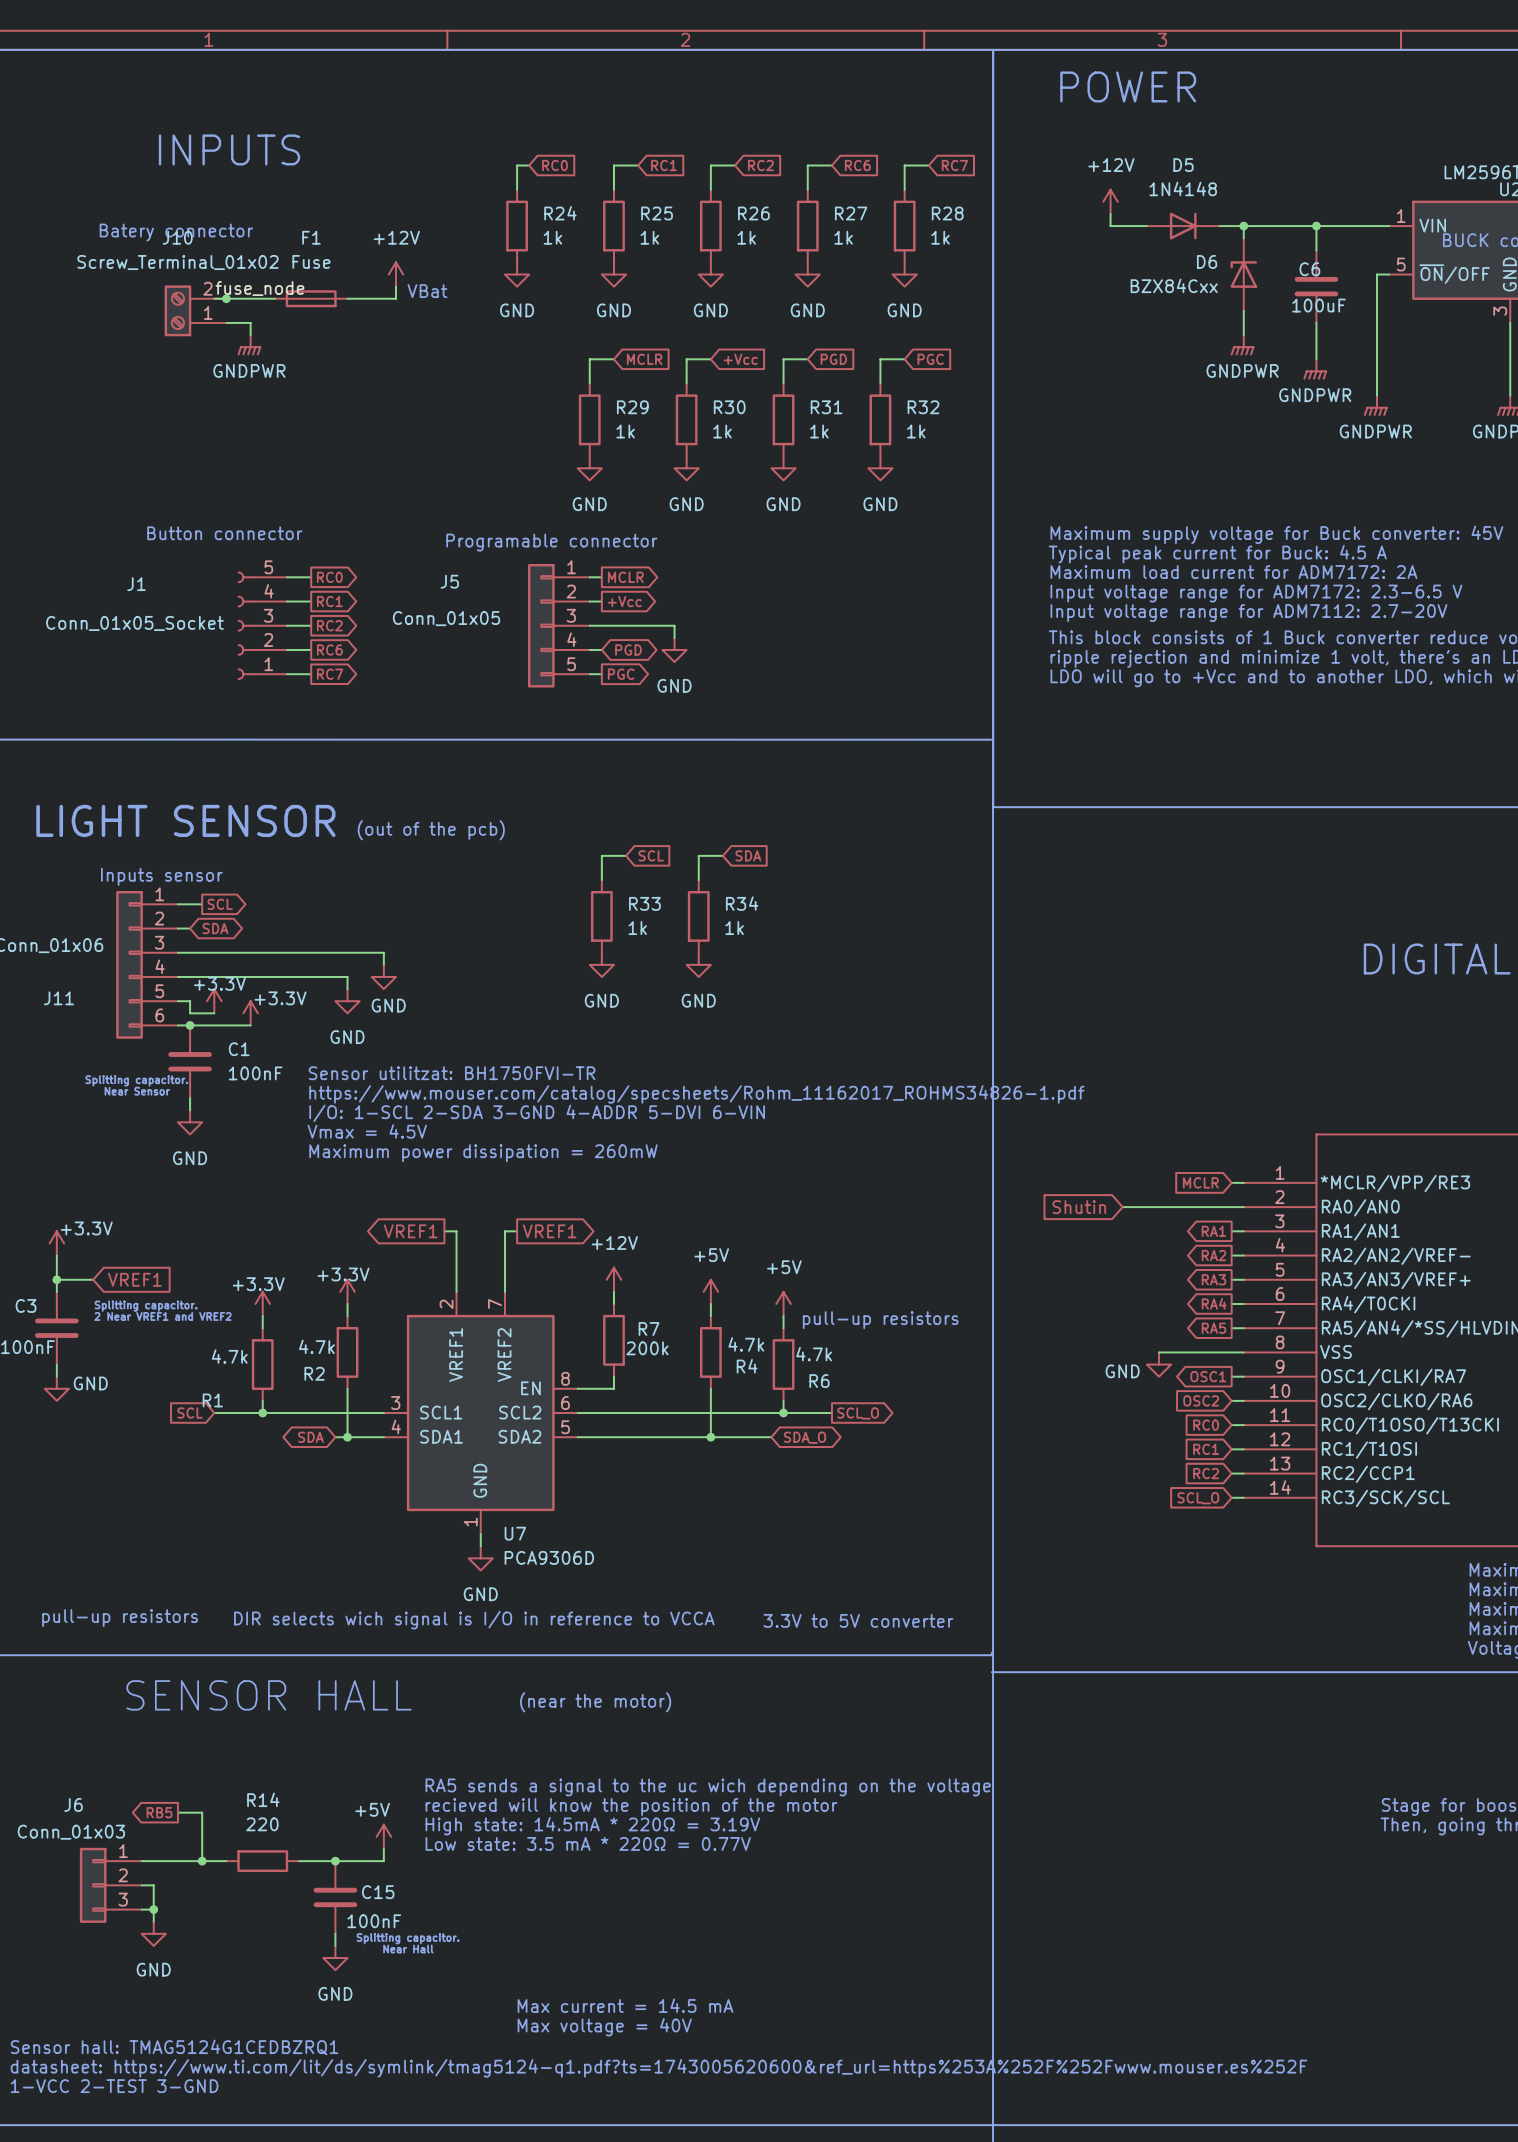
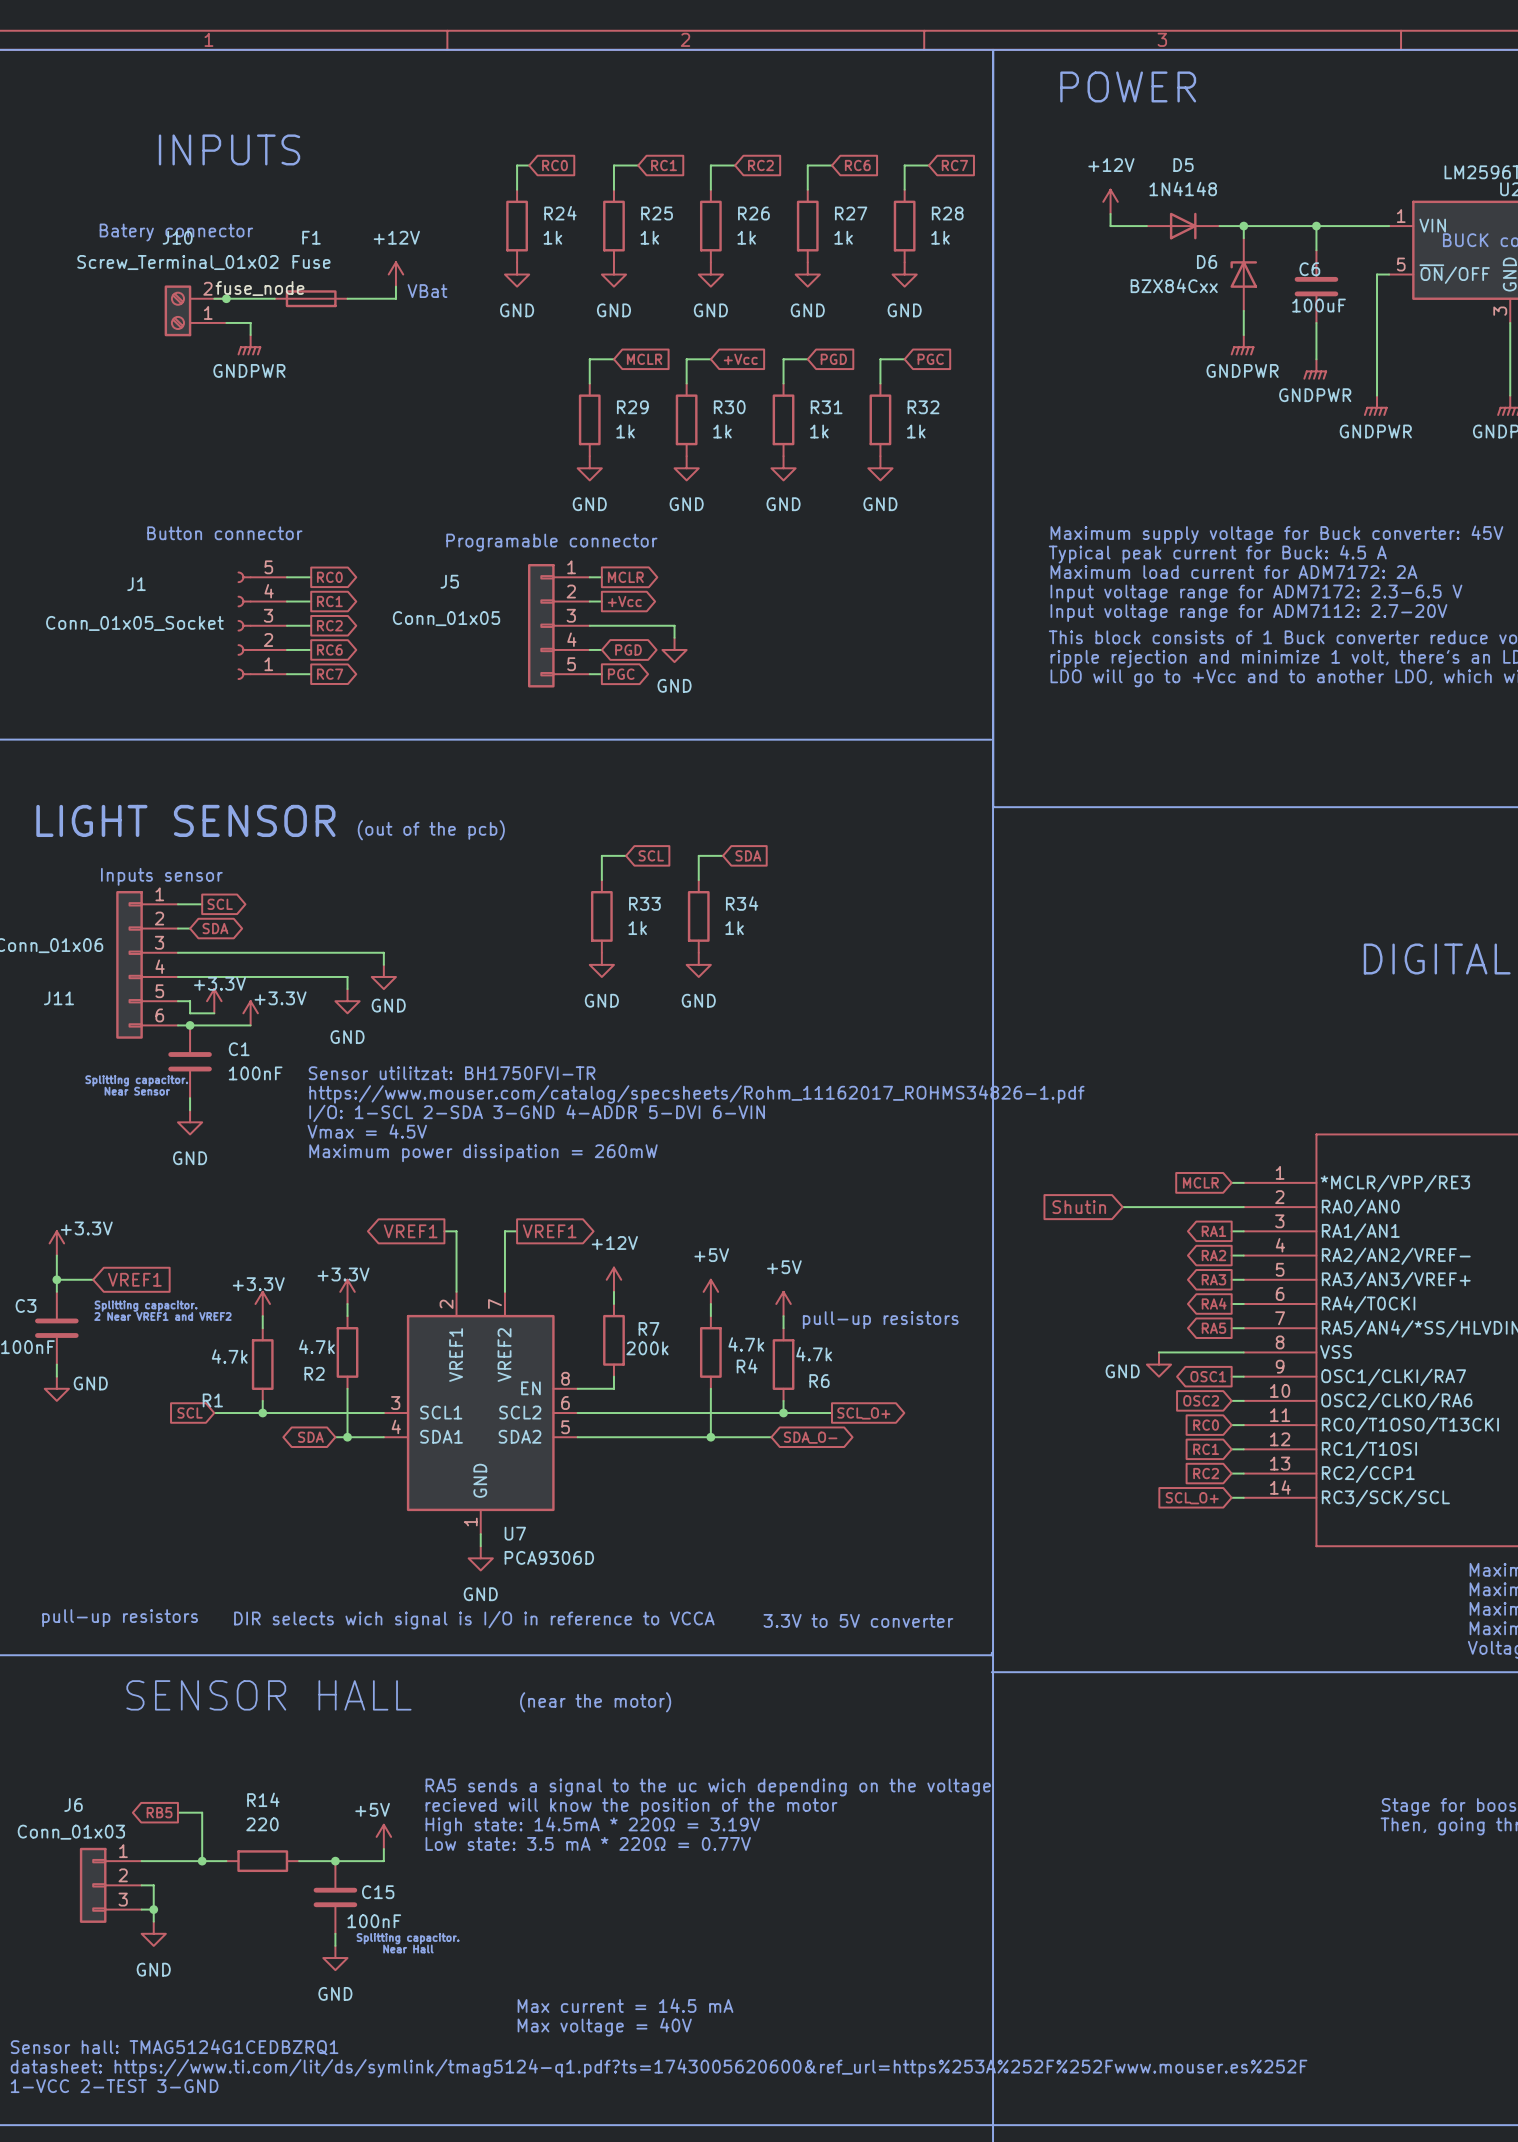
global label: SCL_O (858, 1413) -> SCL_O+ (863, 1413)
global label: SDA_O (804, 1437) -> SDA_O- (810, 1437)
global label: SCL_O (1198, 1498) -> SCL_O+ (1192, 1498)

